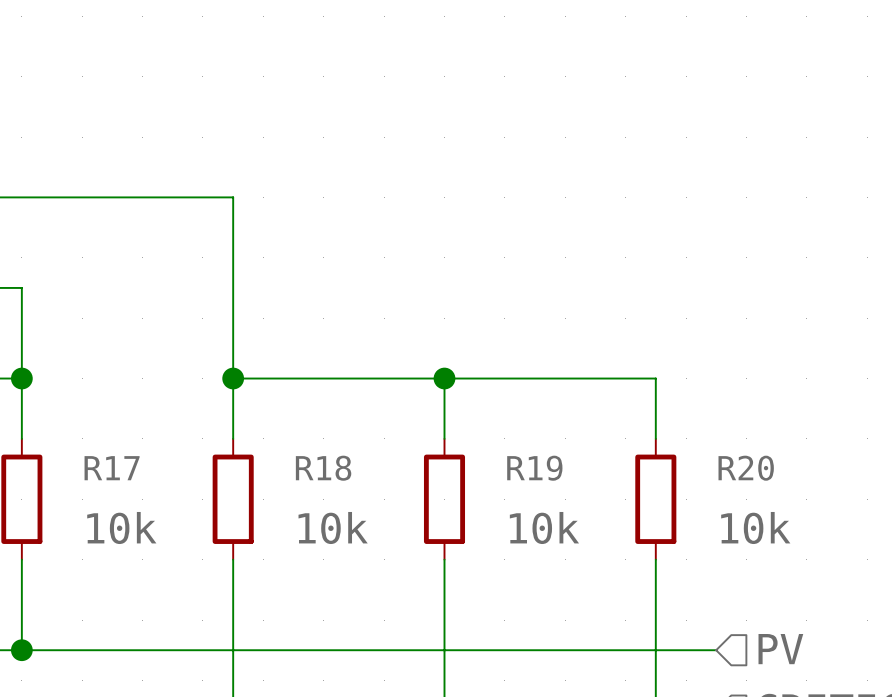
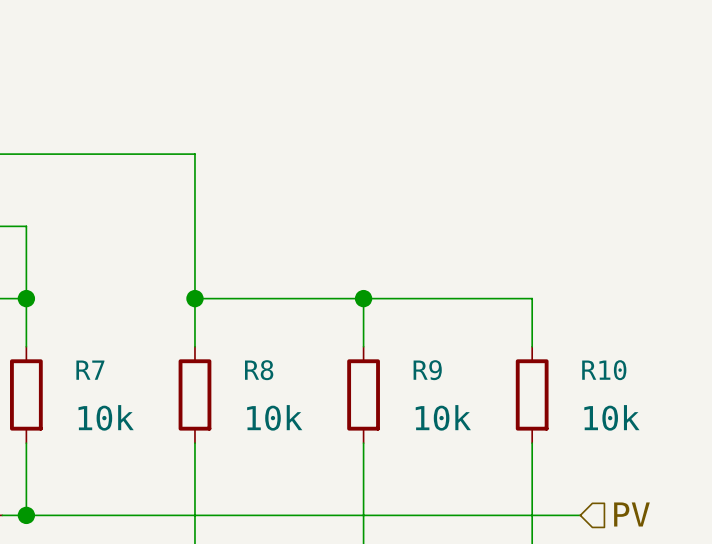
R17 name: R17 (112, 468) -> R7 (90, 370)
R18 name: R18 (323, 468) -> R8 (259, 370)
R19 name: R19 (534, 468) -> R9 (427, 370)
R20 name: R20 (746, 468) -> R10 (604, 370)

